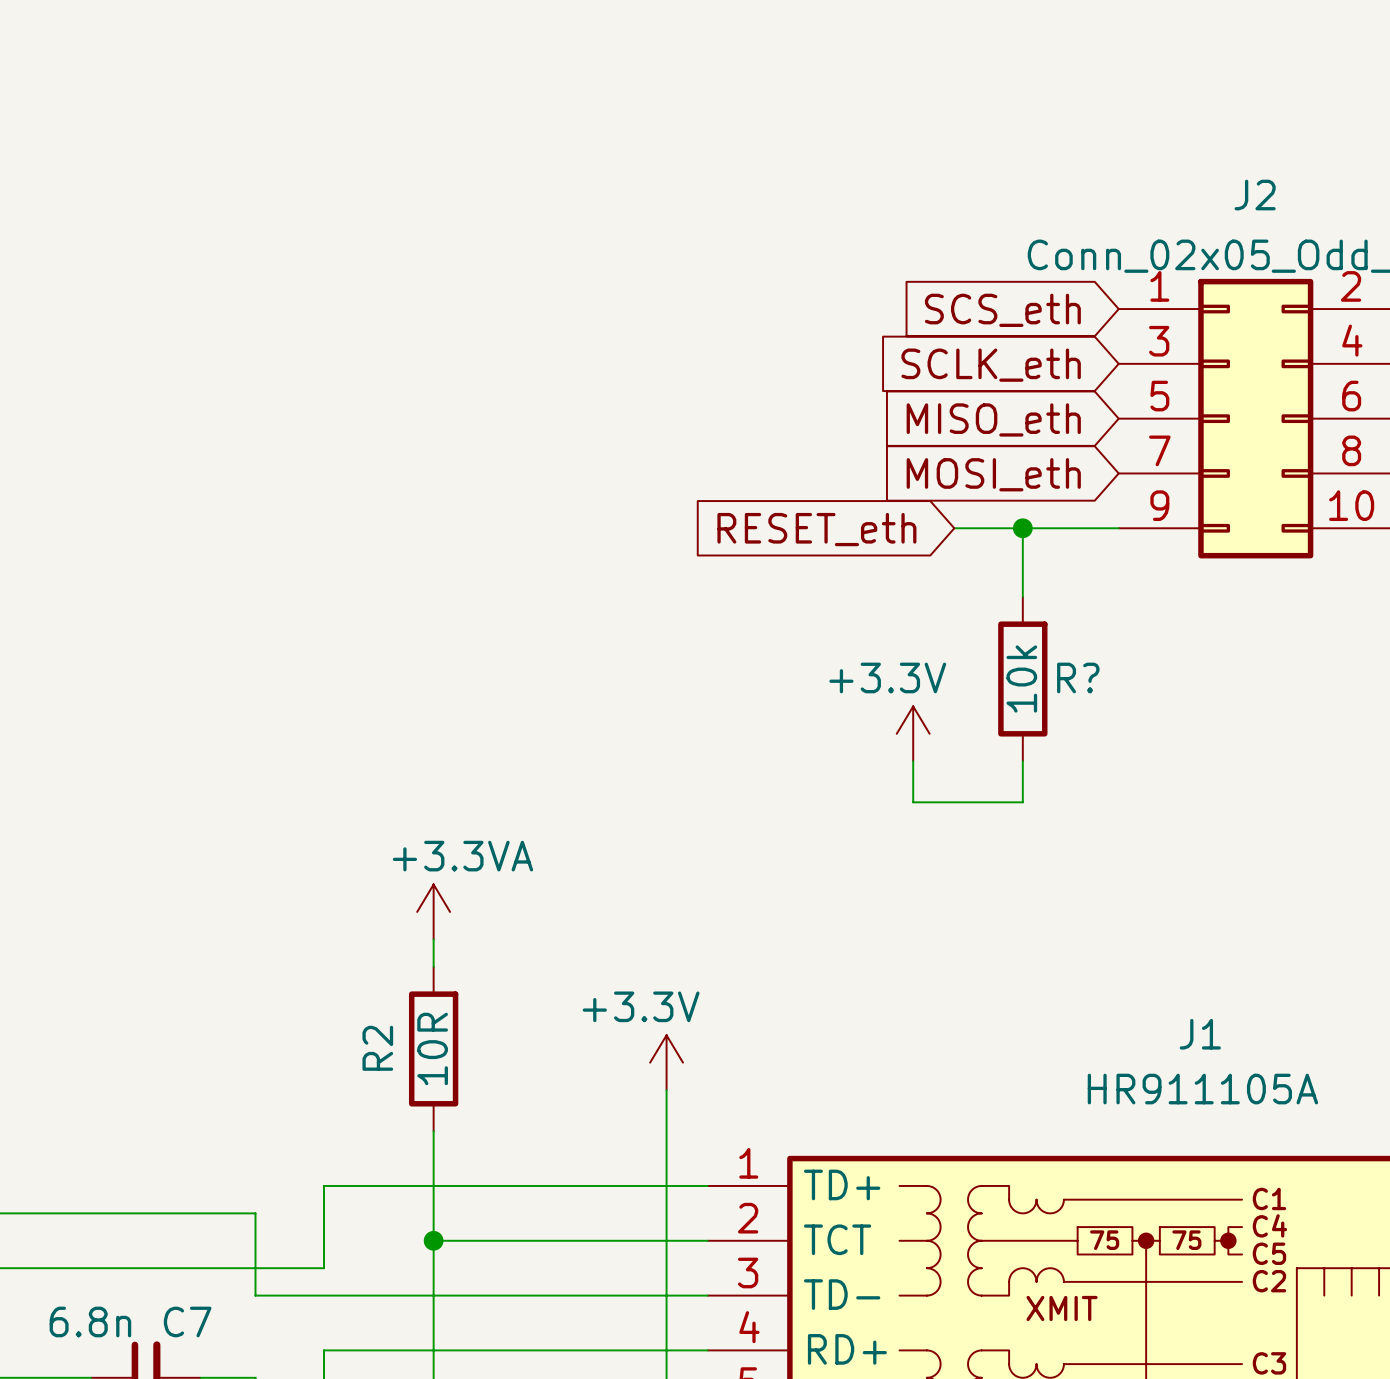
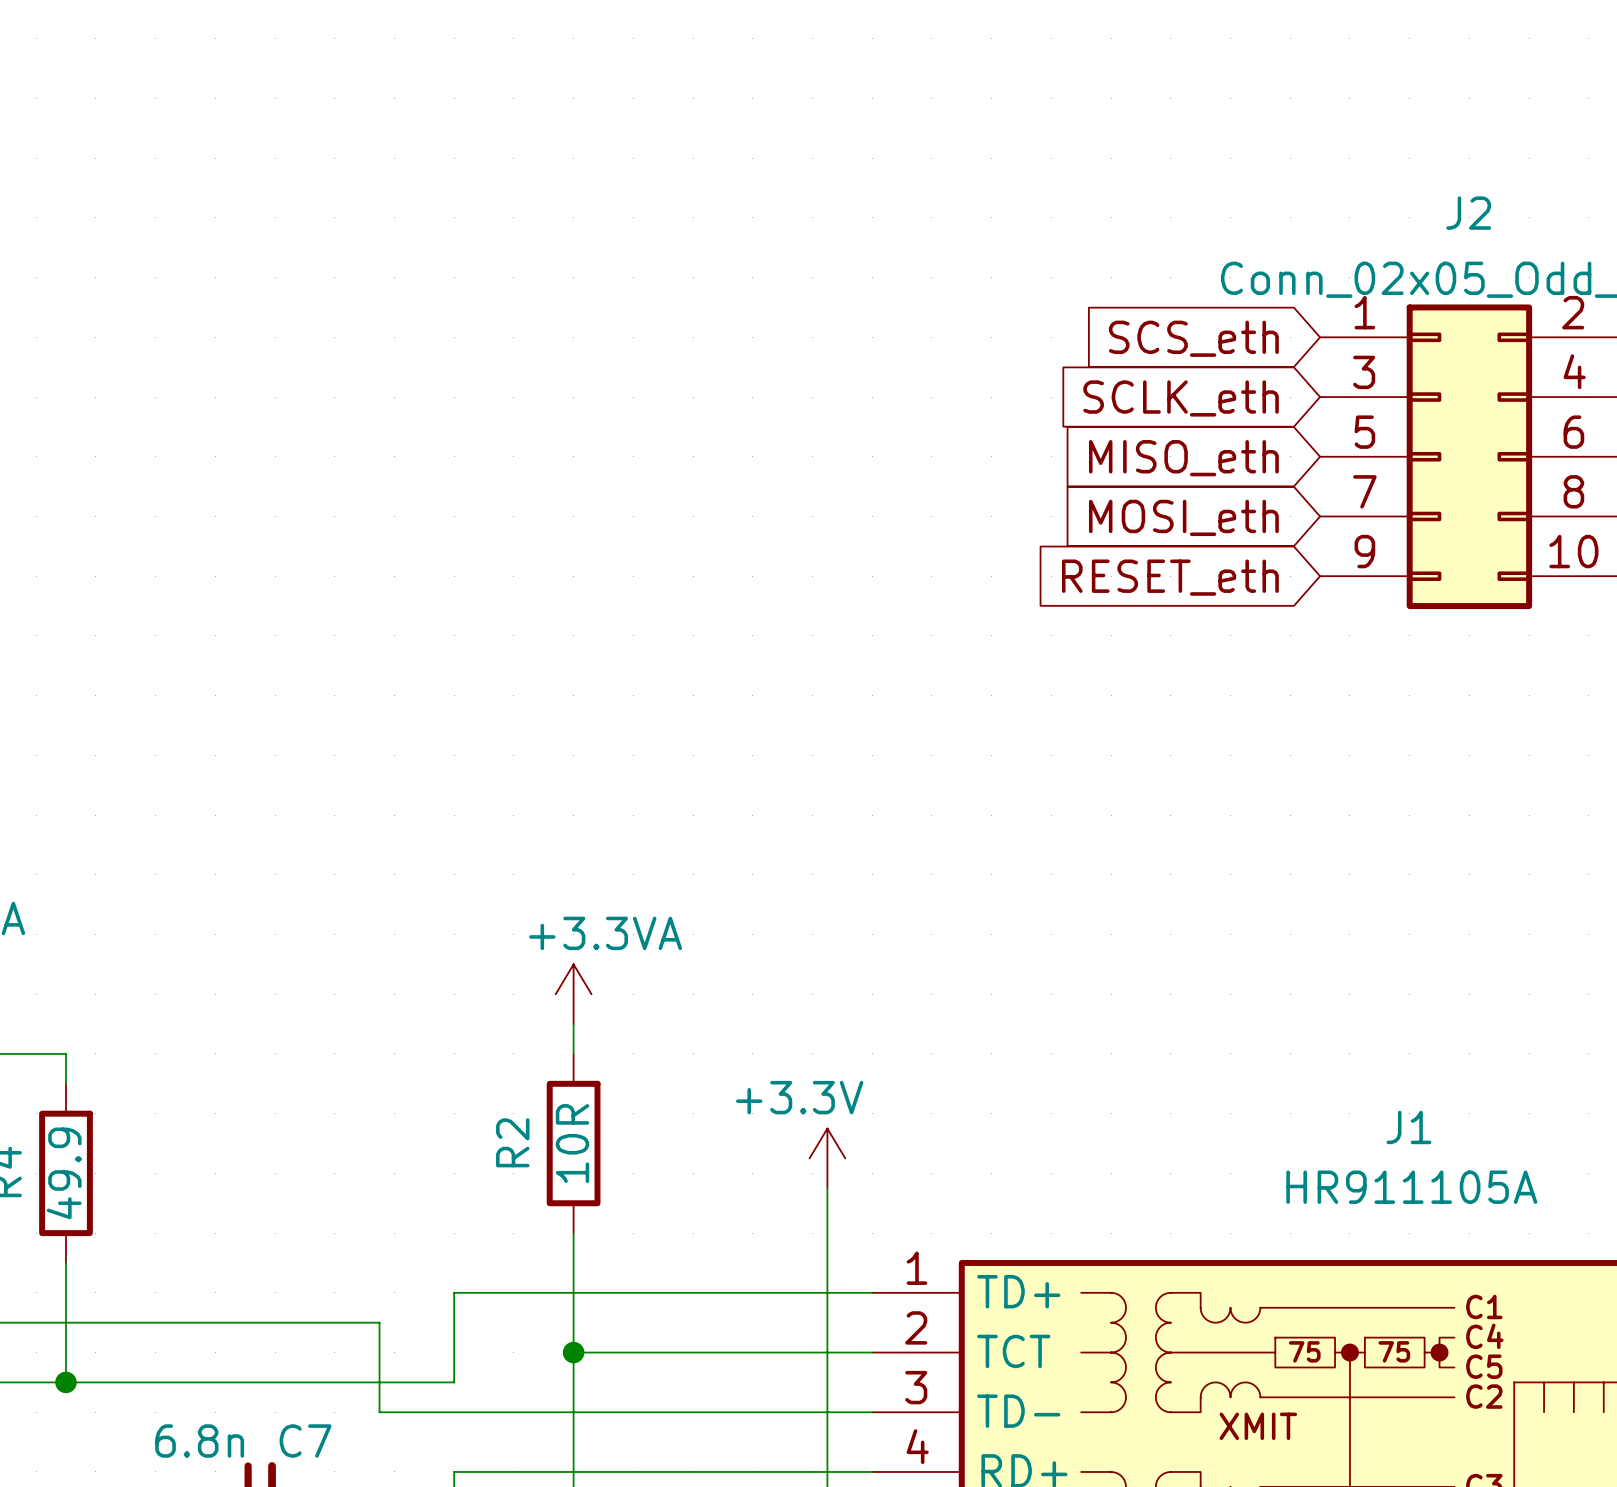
wire: (954, 528) (1118, 528) -> none
wire: (1022, 528) (1022, 596) -> none
junction: (1022, 528) -> none
global label position: RESET_eth (816, 529) -> RESET_eth (1170, 577)
R?: 10k (1022, 678) -> none
power symbol: +3.3V (913, 733) -> none
wire: (913, 761) (913, 802) (1022, 802) (1022, 761) -> none

